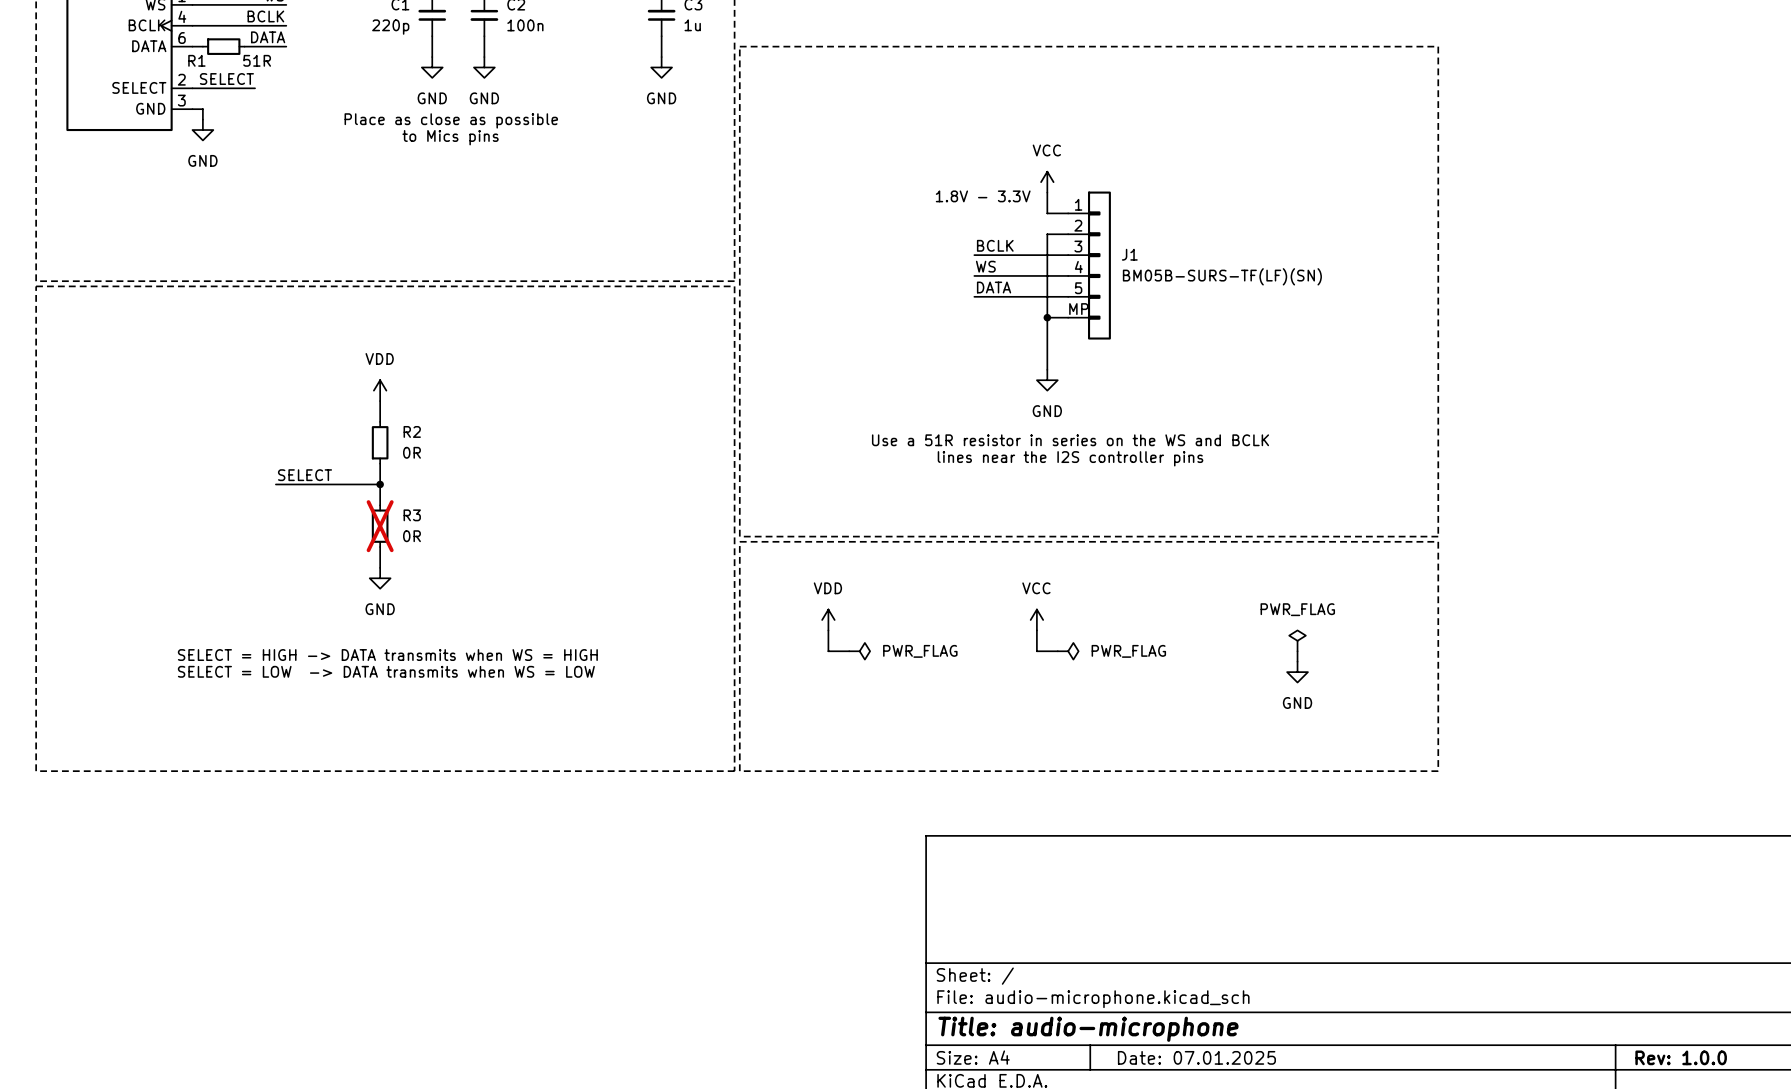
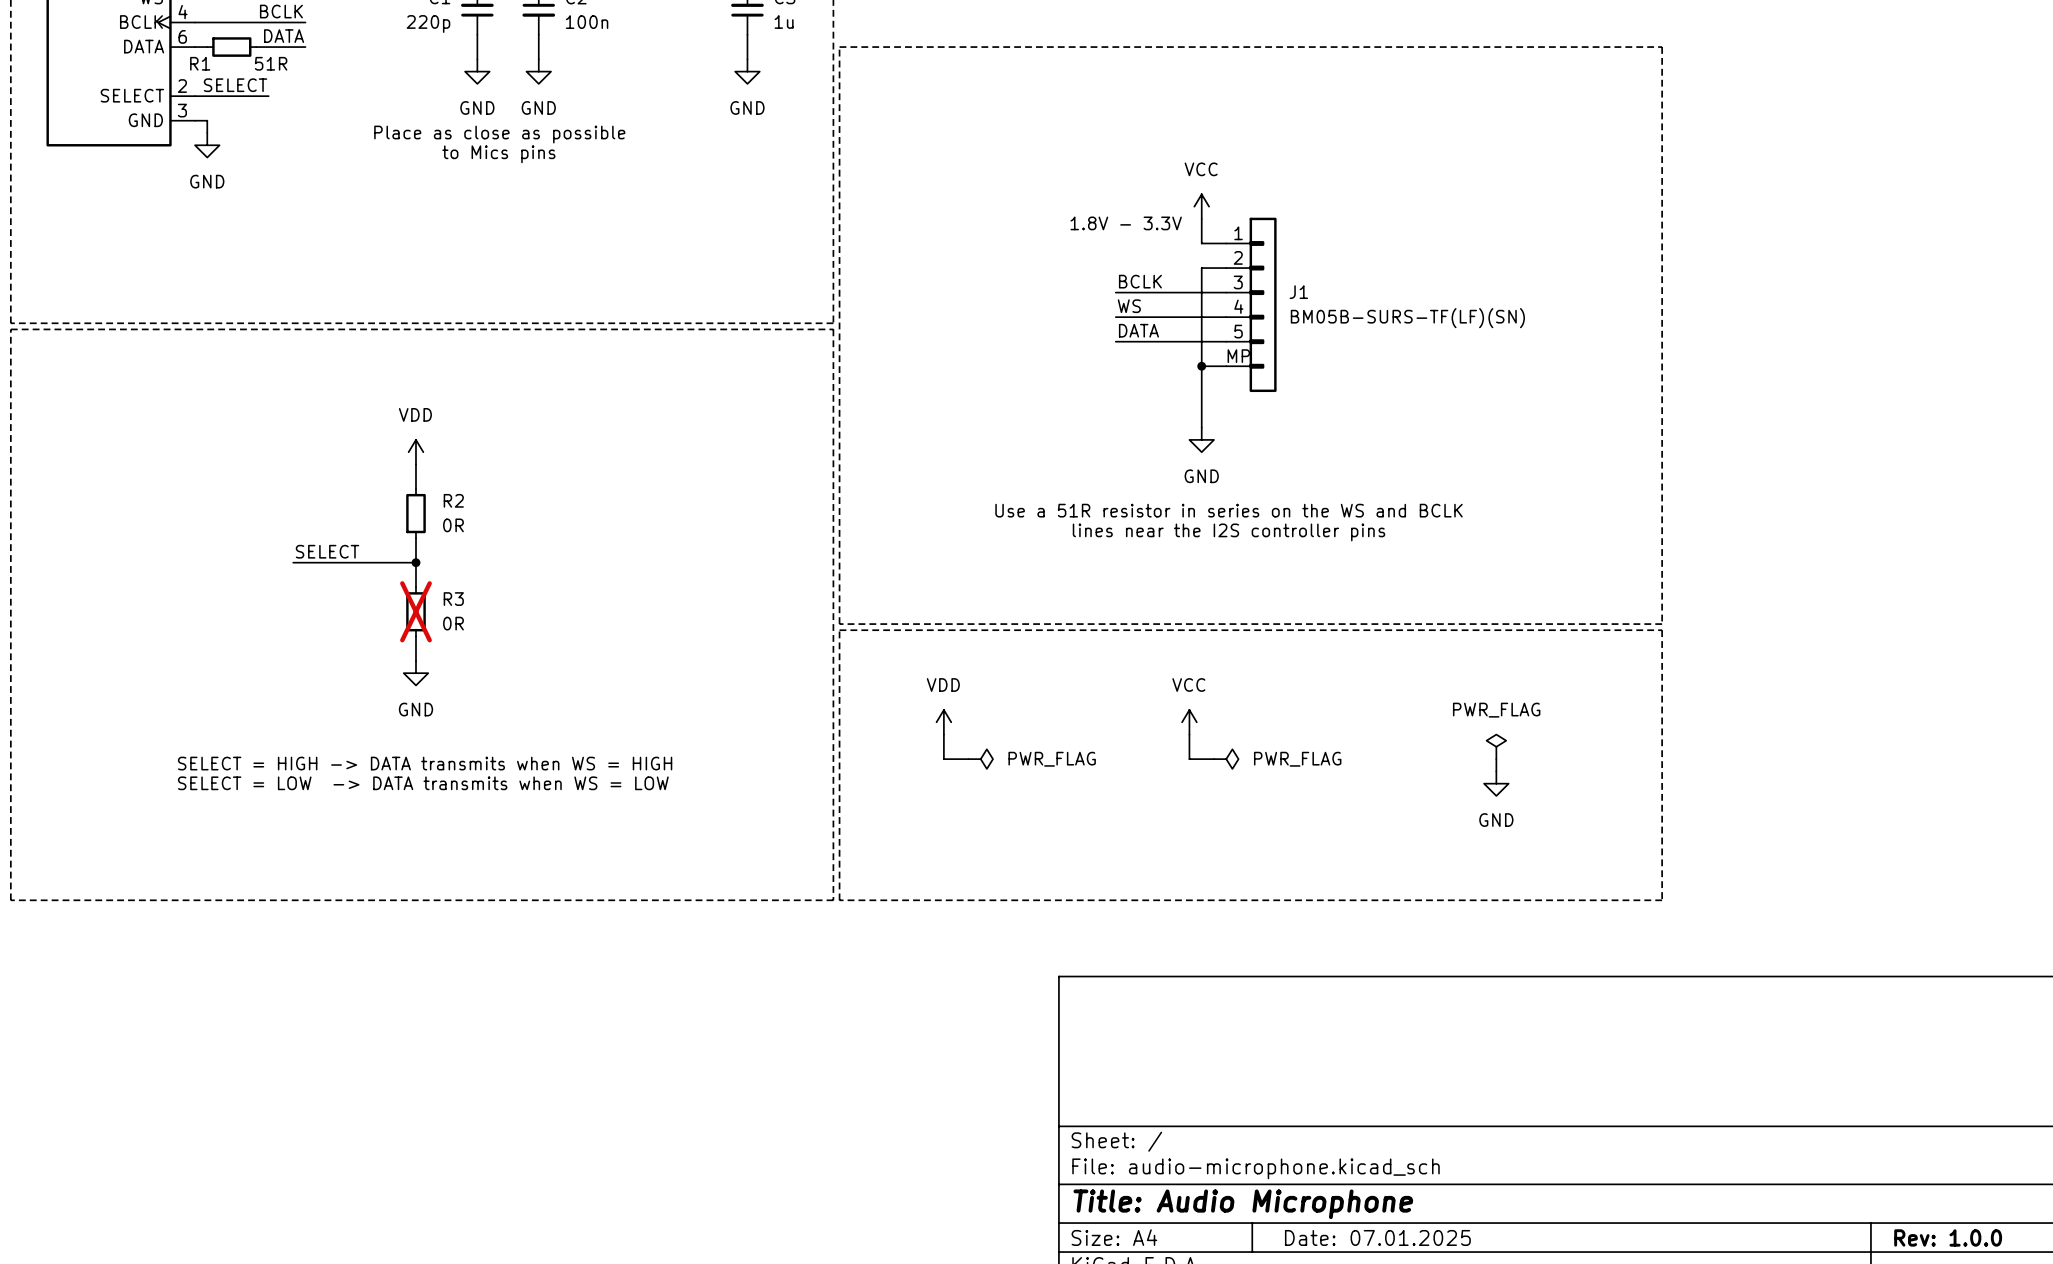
title block: Title: audio-microphone (1088, 1029) -> Title: Audio Microphone (1243, 1204)

